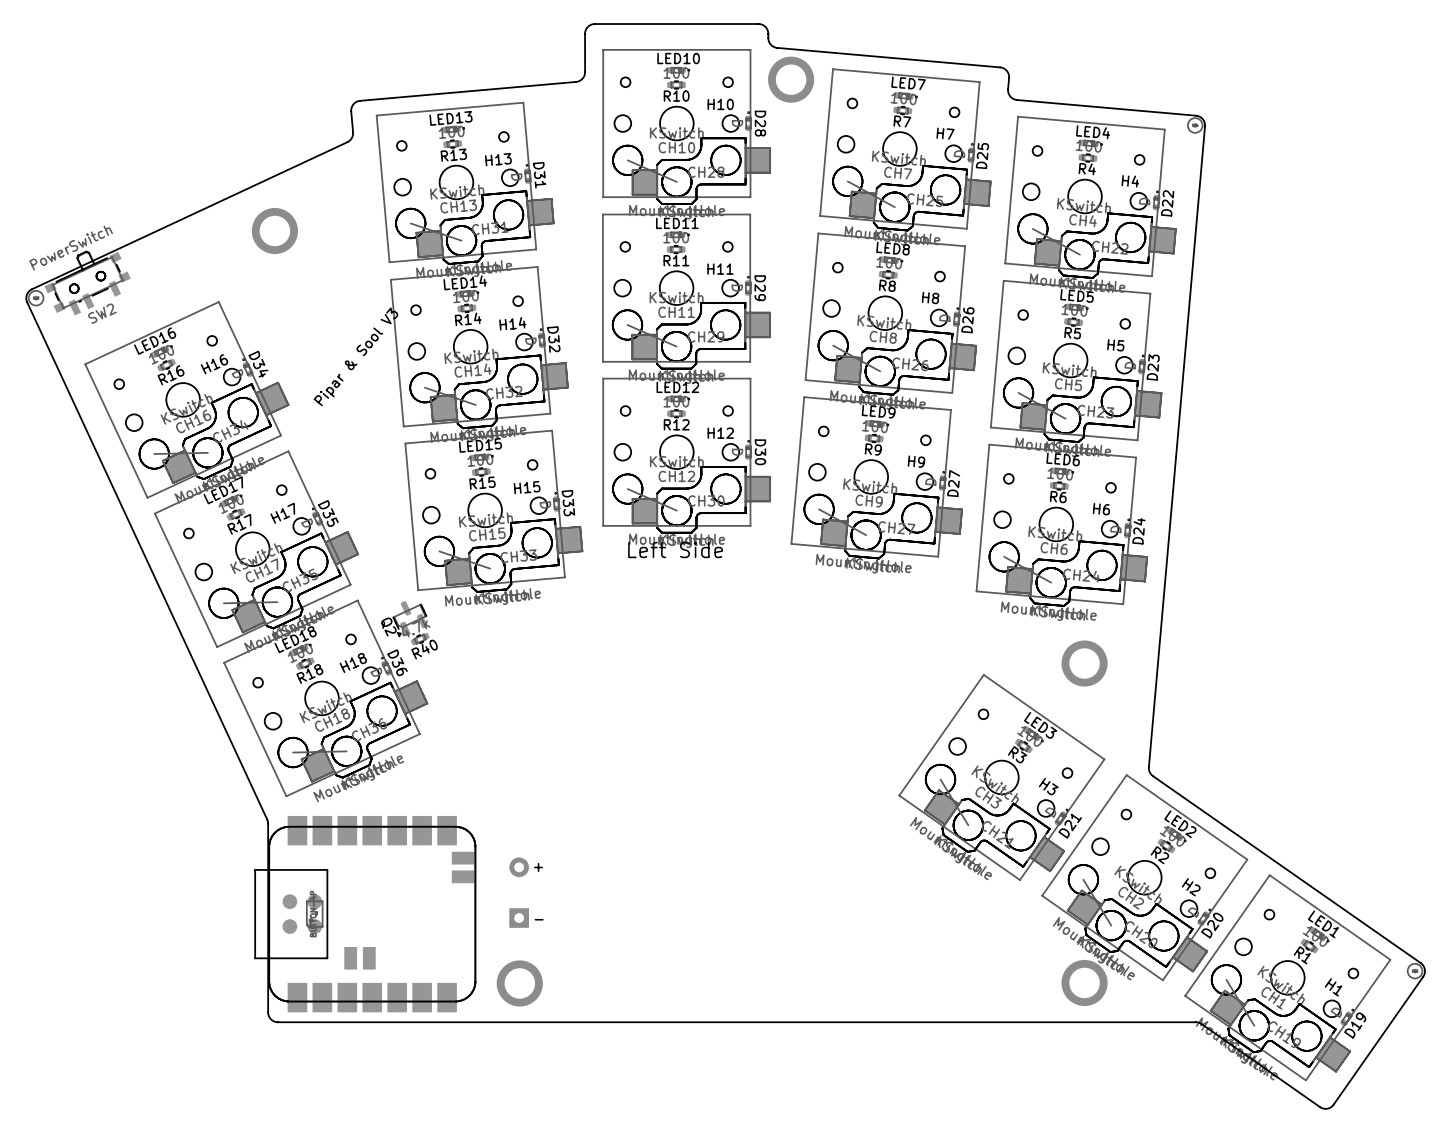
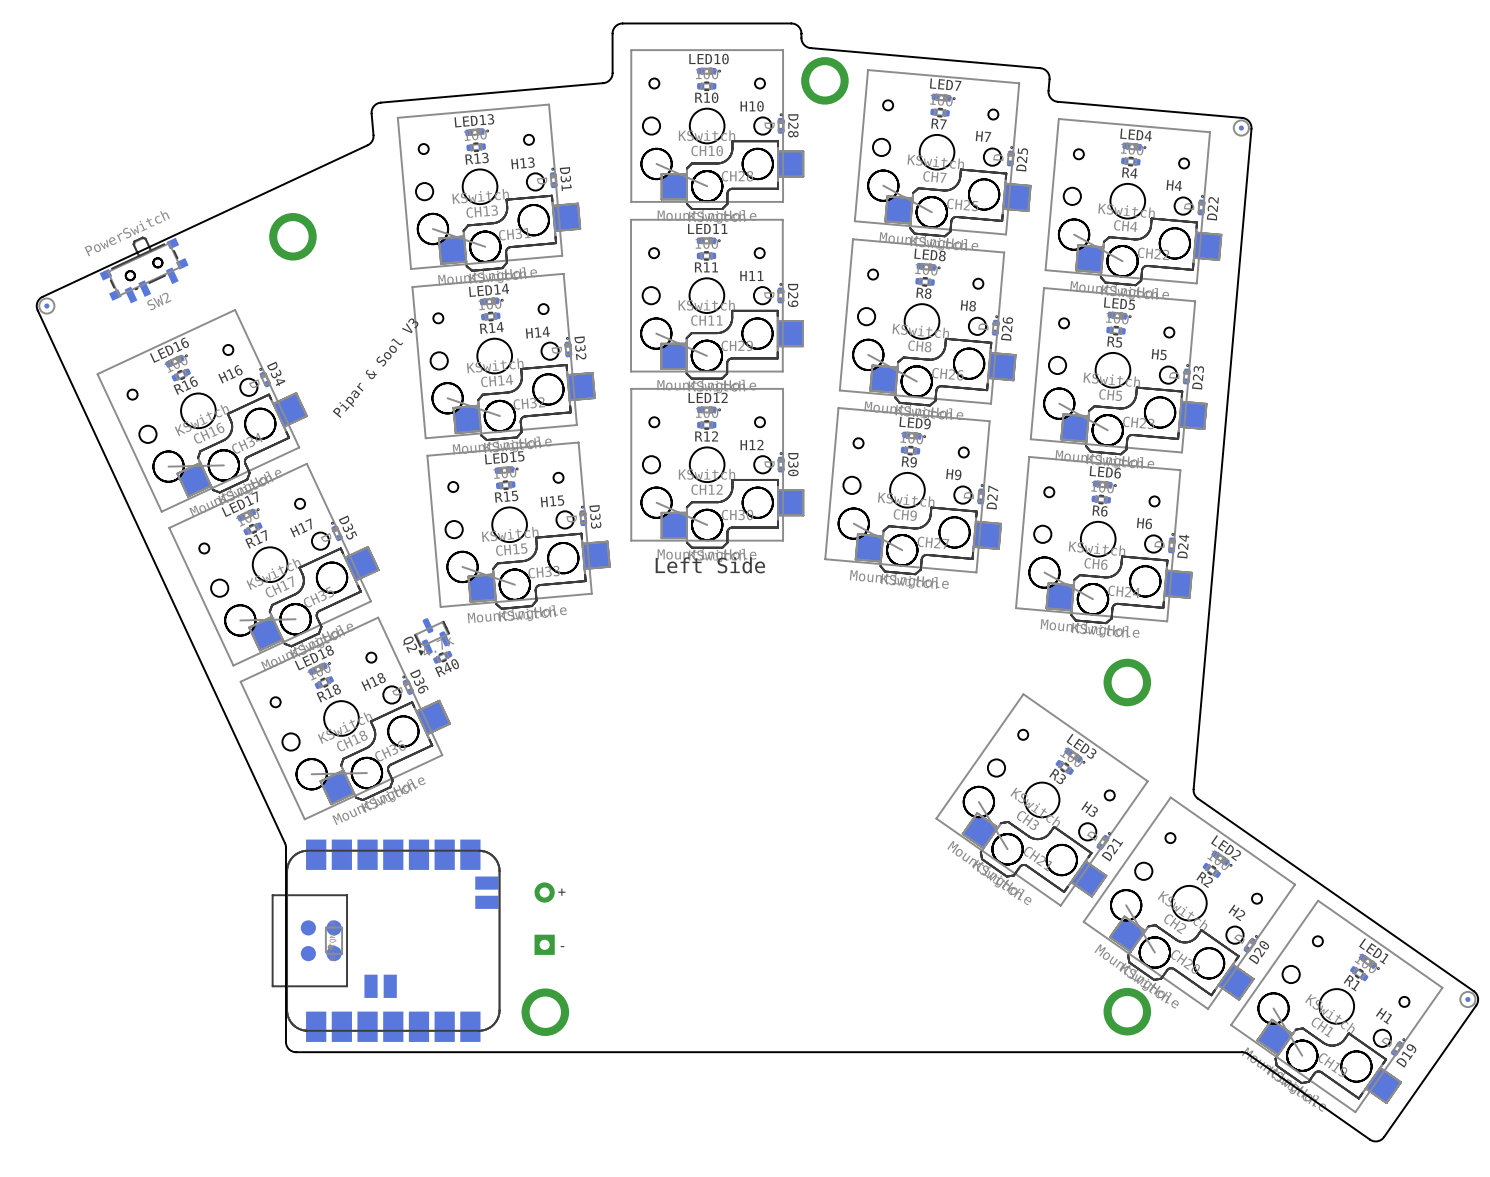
part position: (87, 282) -> (144, 269)
SW2 position: (87, 283) -> (144, 270)

